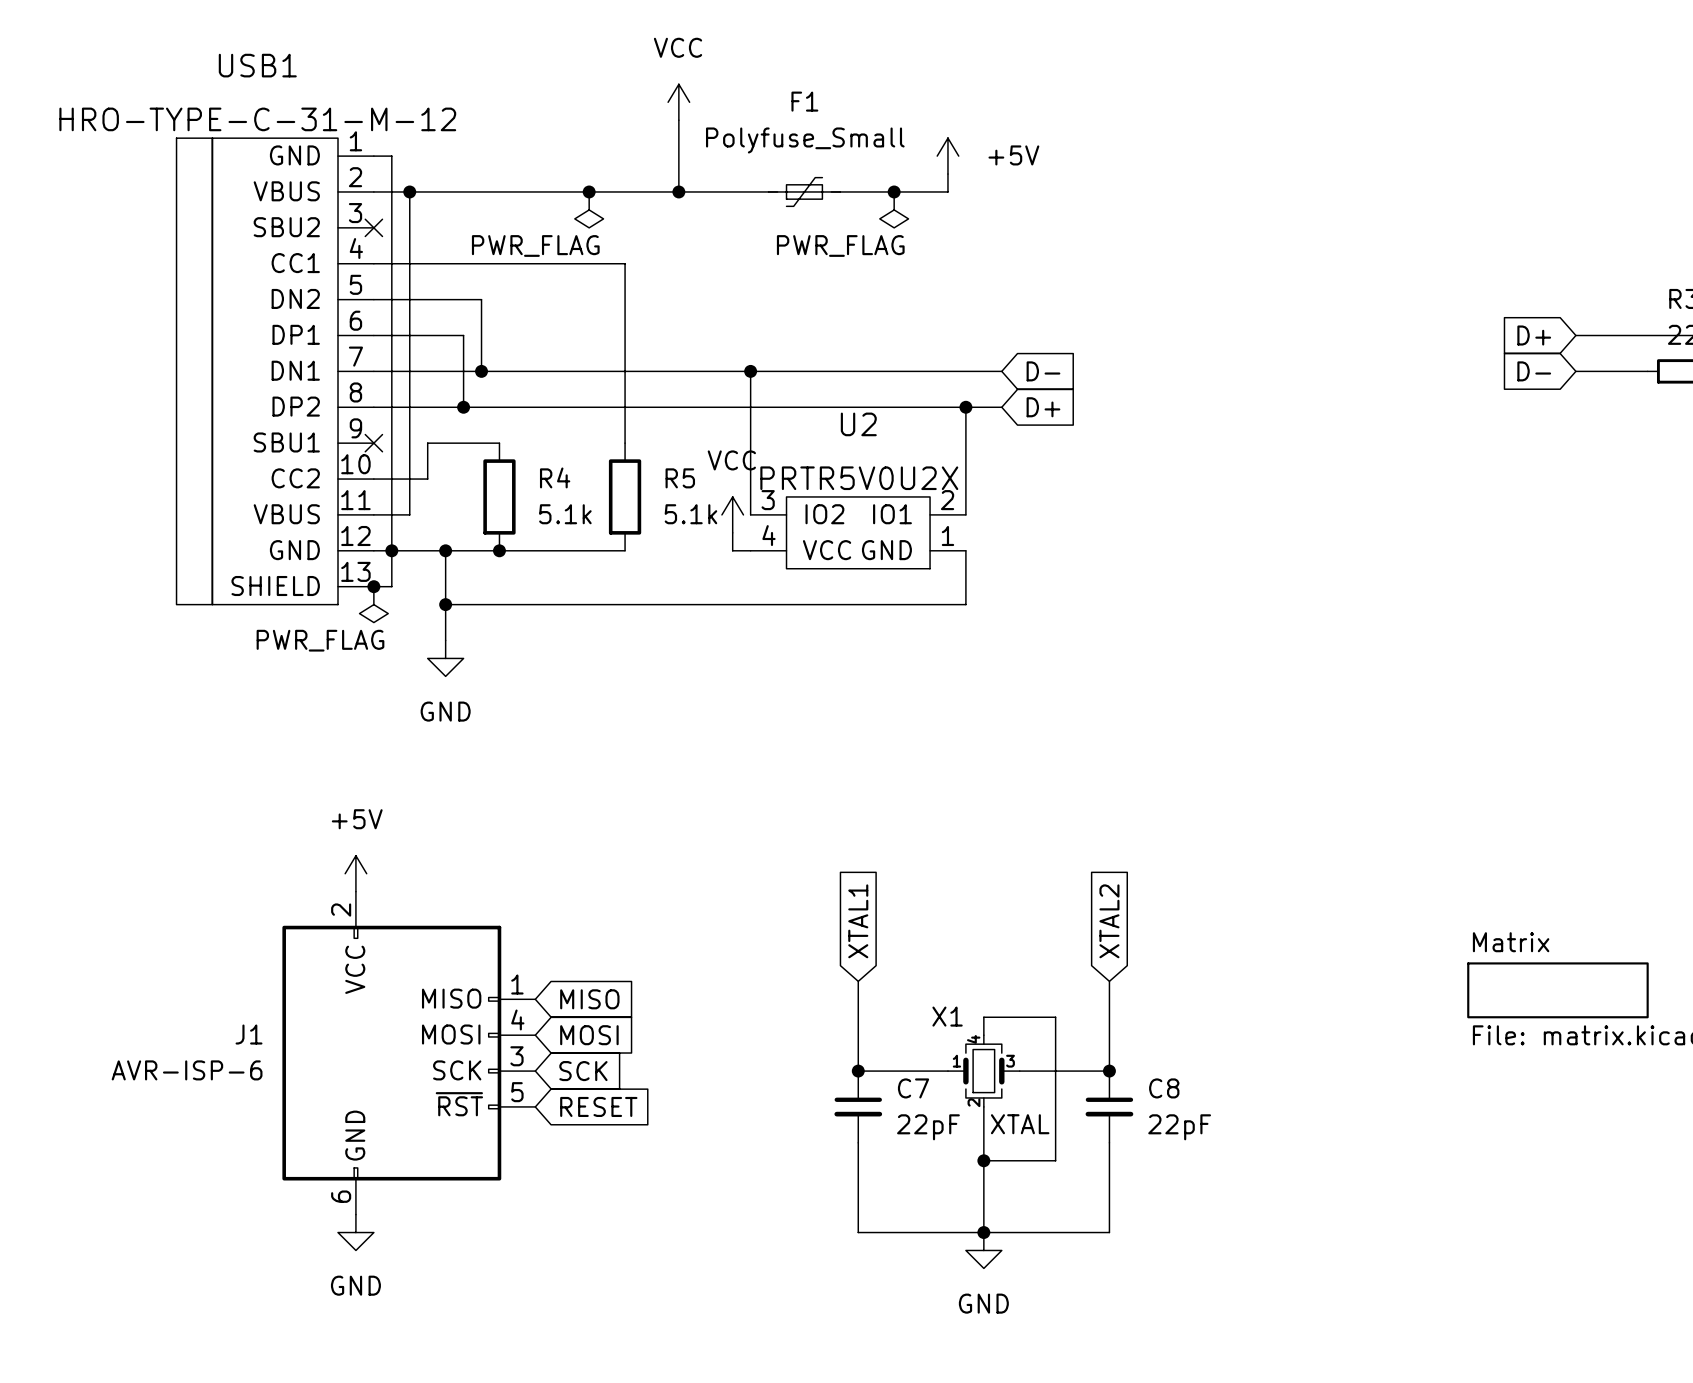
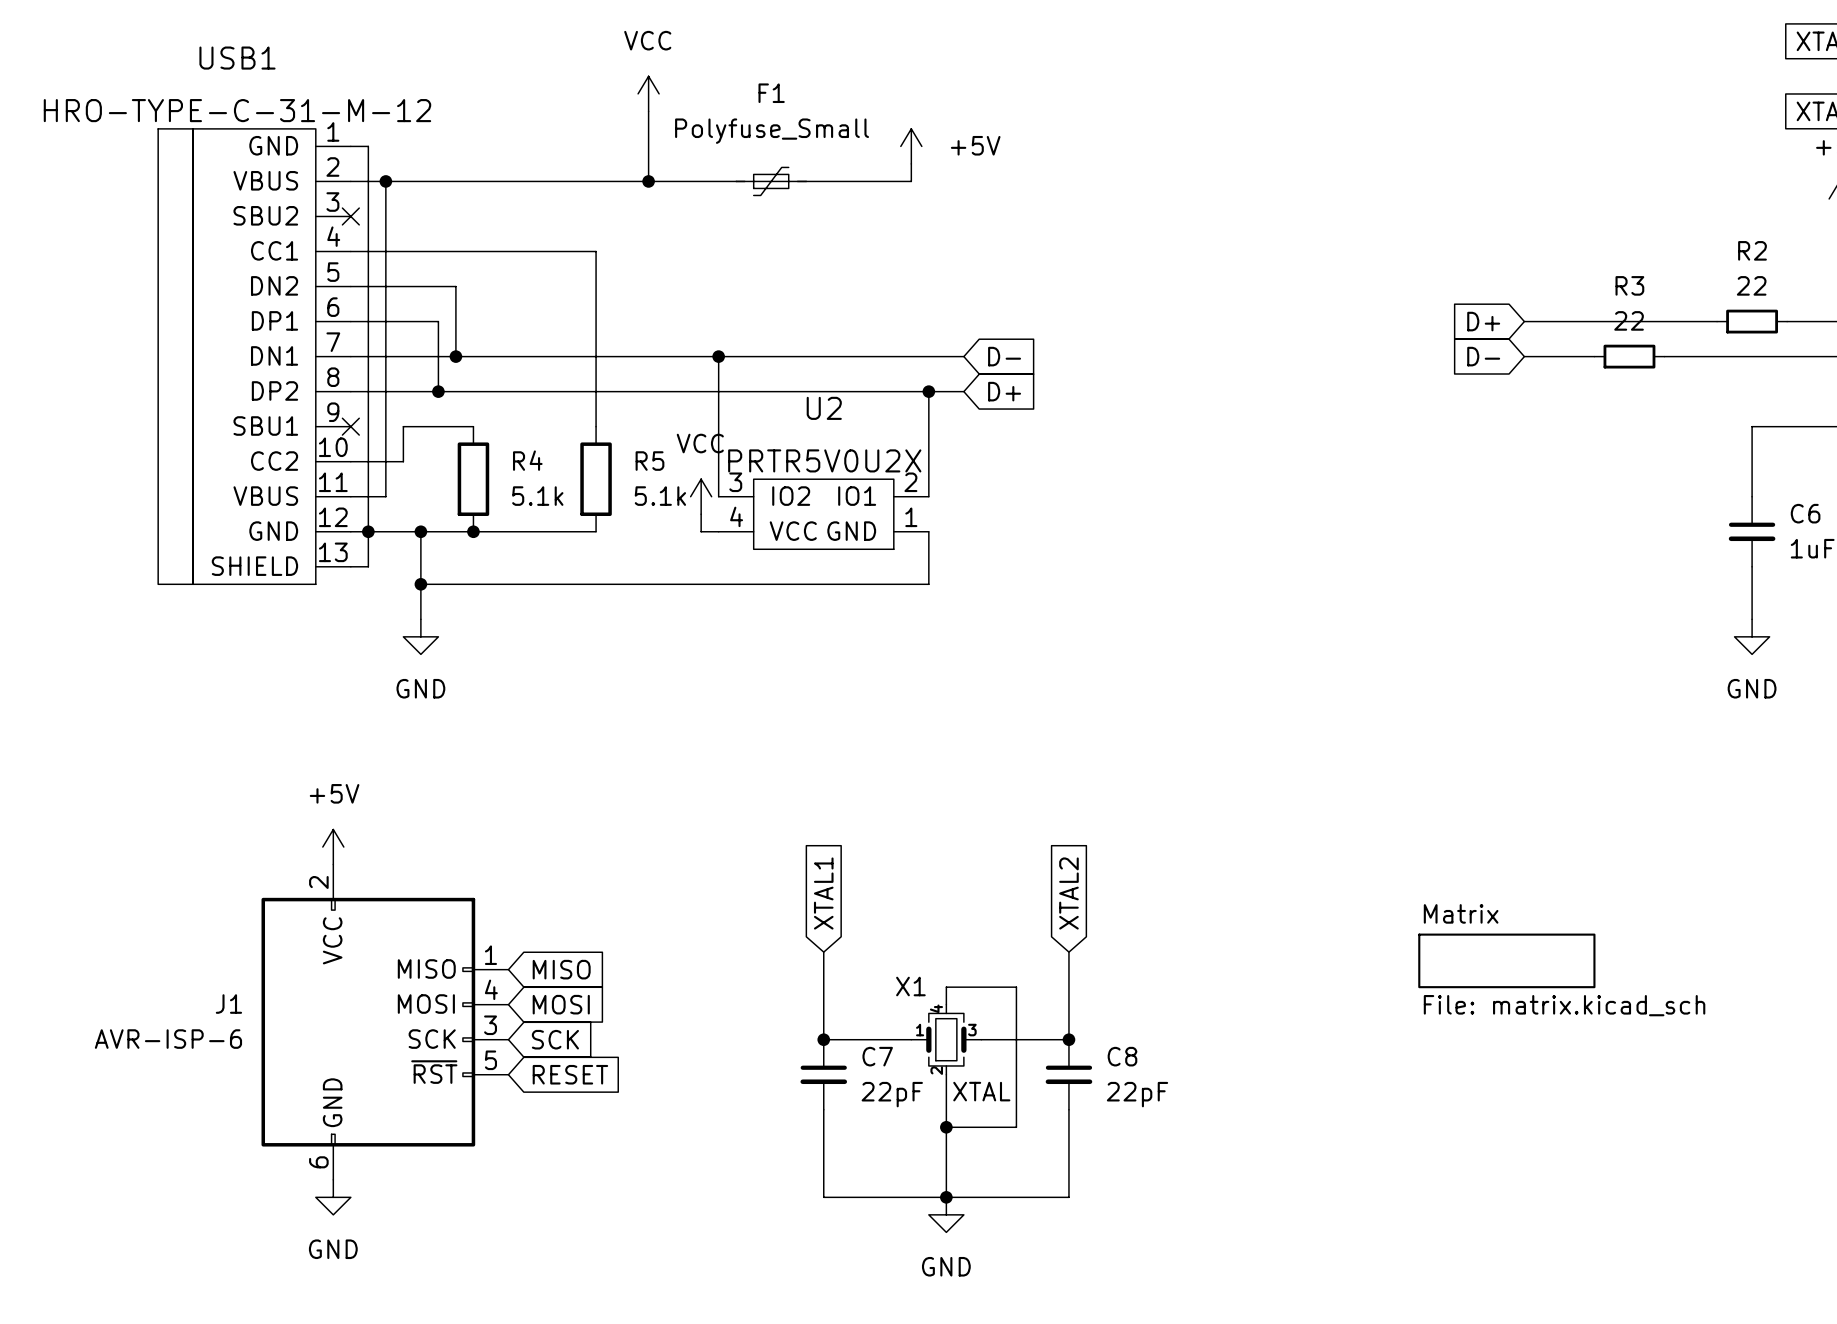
junction: (589, 191) -> none
junction: (894, 191) -> none
power symbol: PWR_FLAG (589, 209) -> none
power symbol: PWR_FLAG (894, 209) -> none
junction: (373, 586) -> none
power symbol: PWR_FLAG (373, 604) -> none

